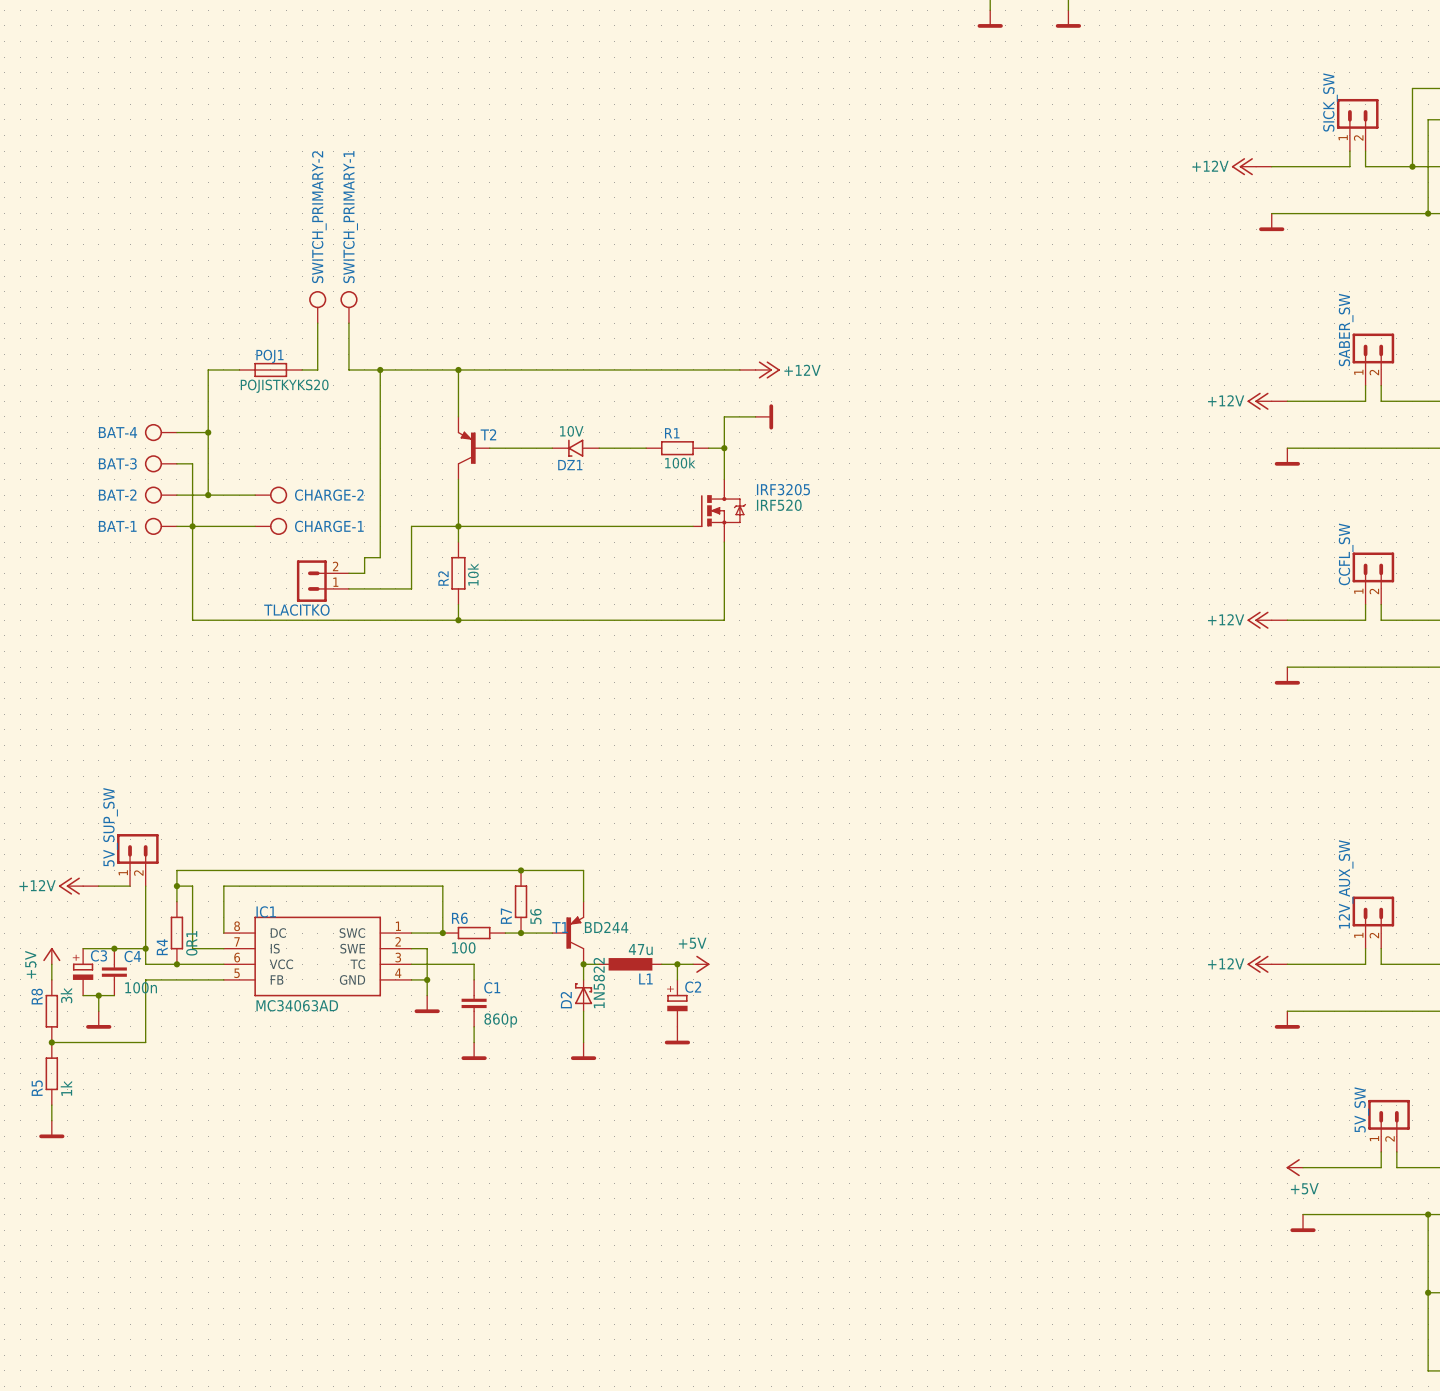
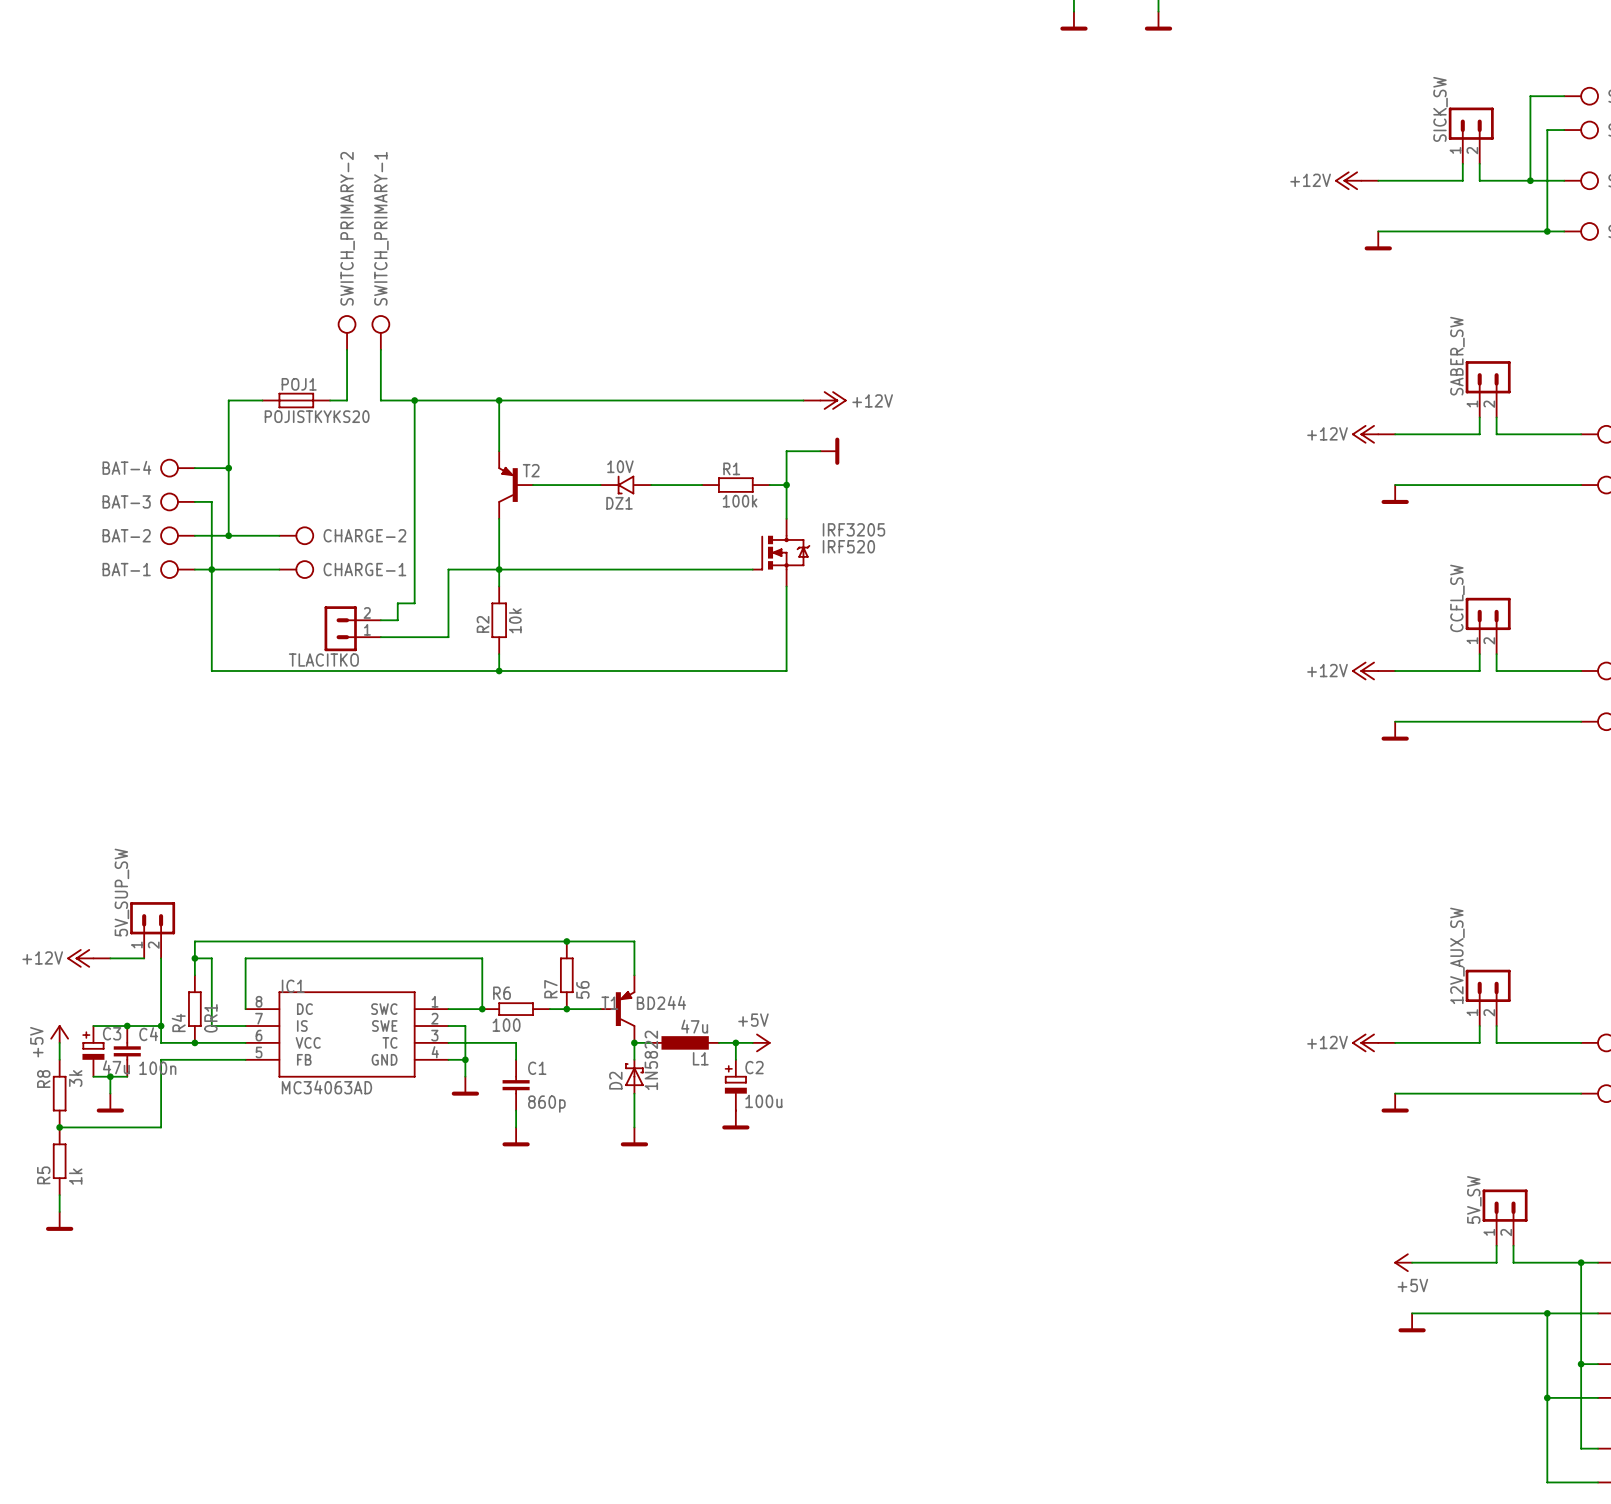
C3 value: none -> 47u (116, 1067)
C2 value: none -> 100u (763, 1101)

